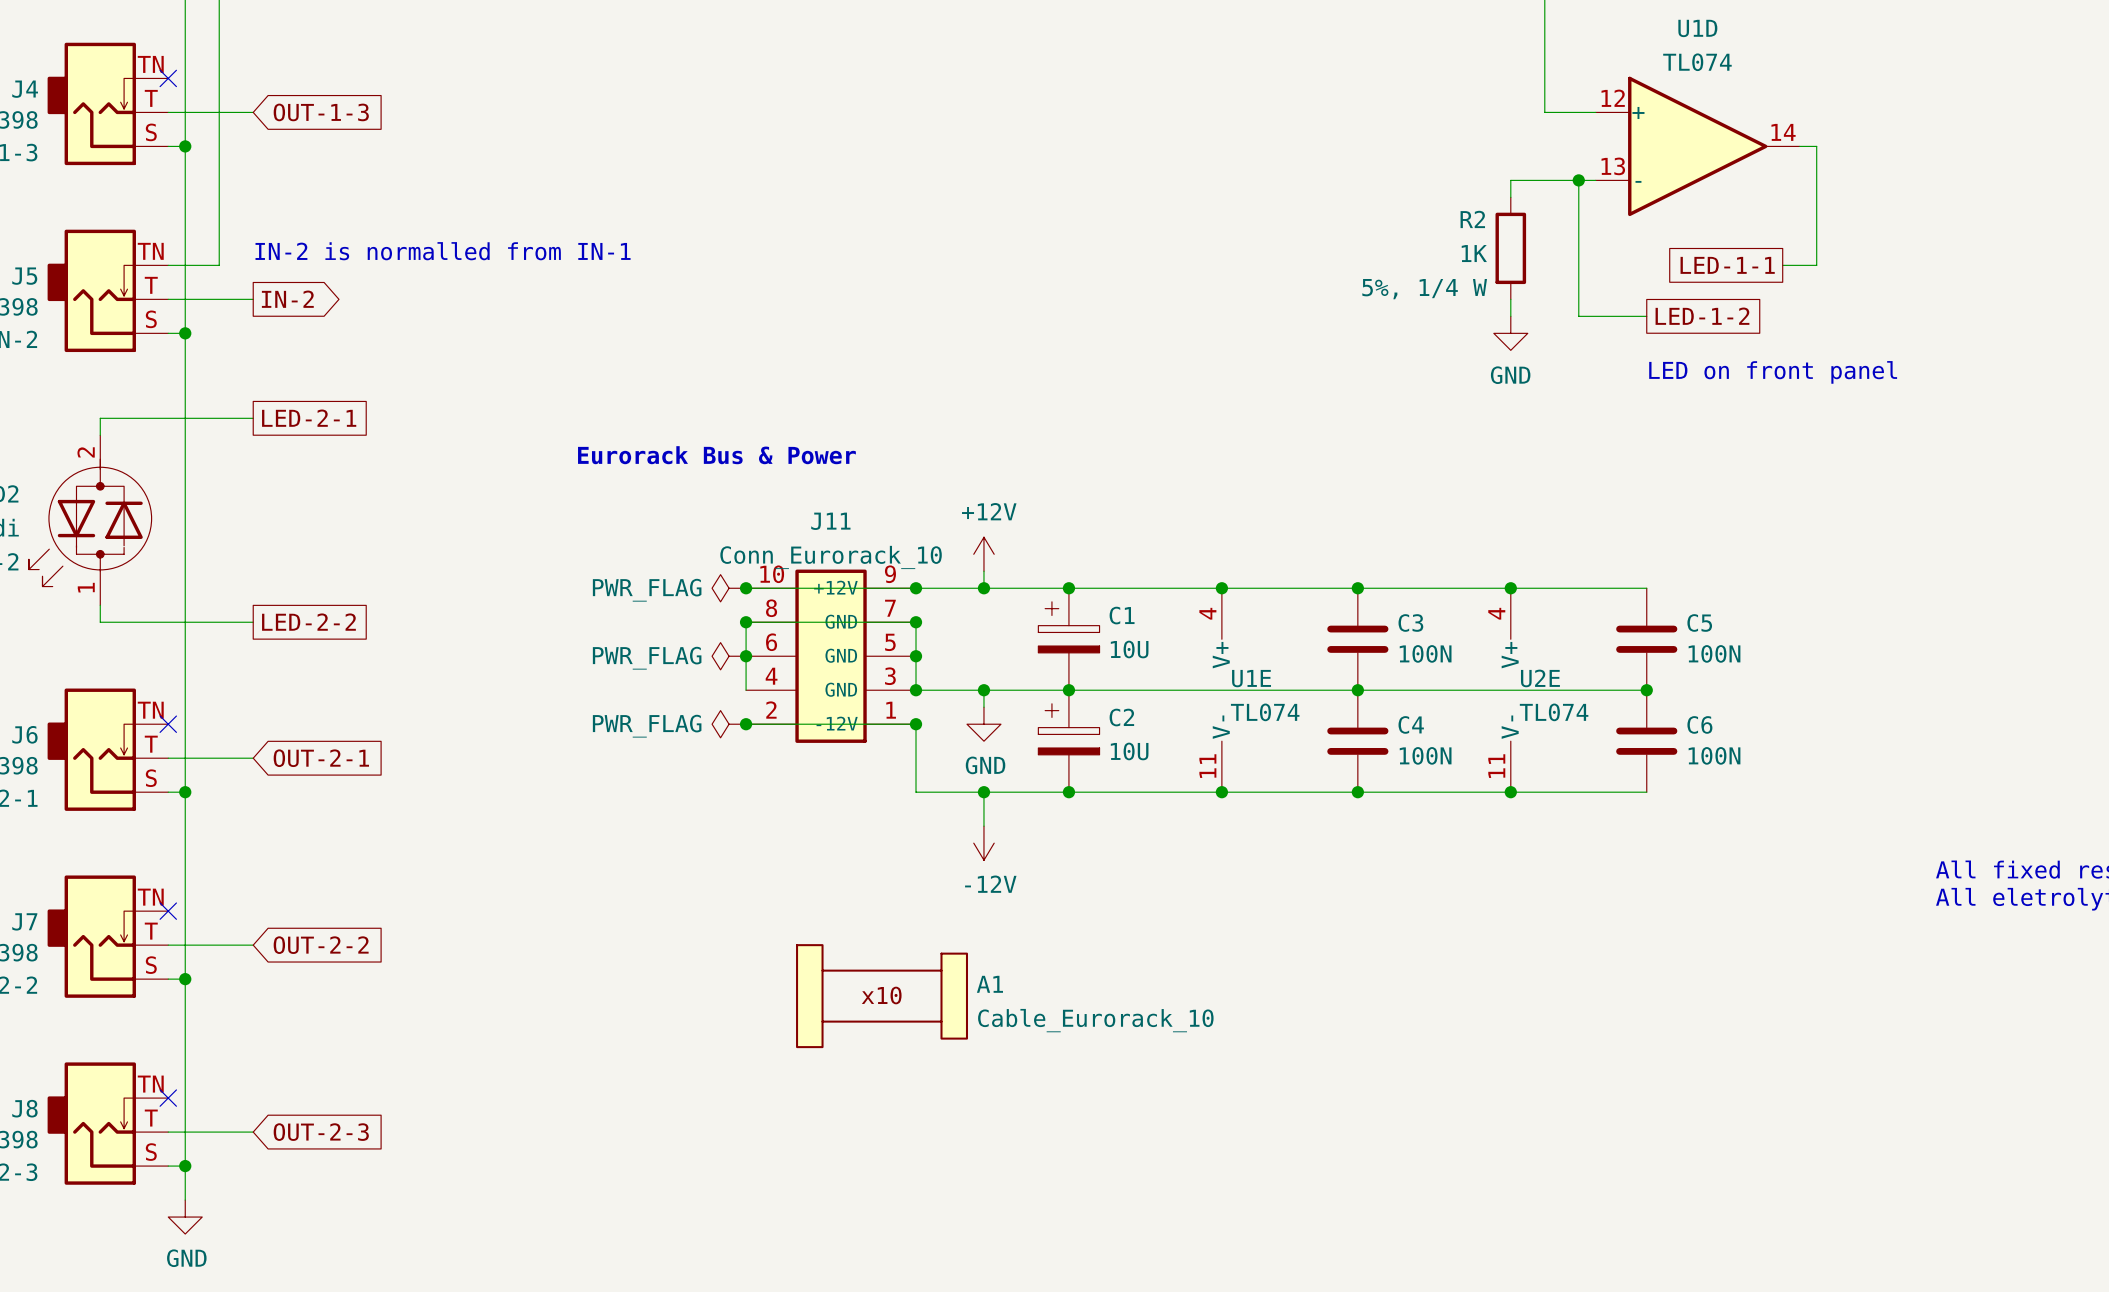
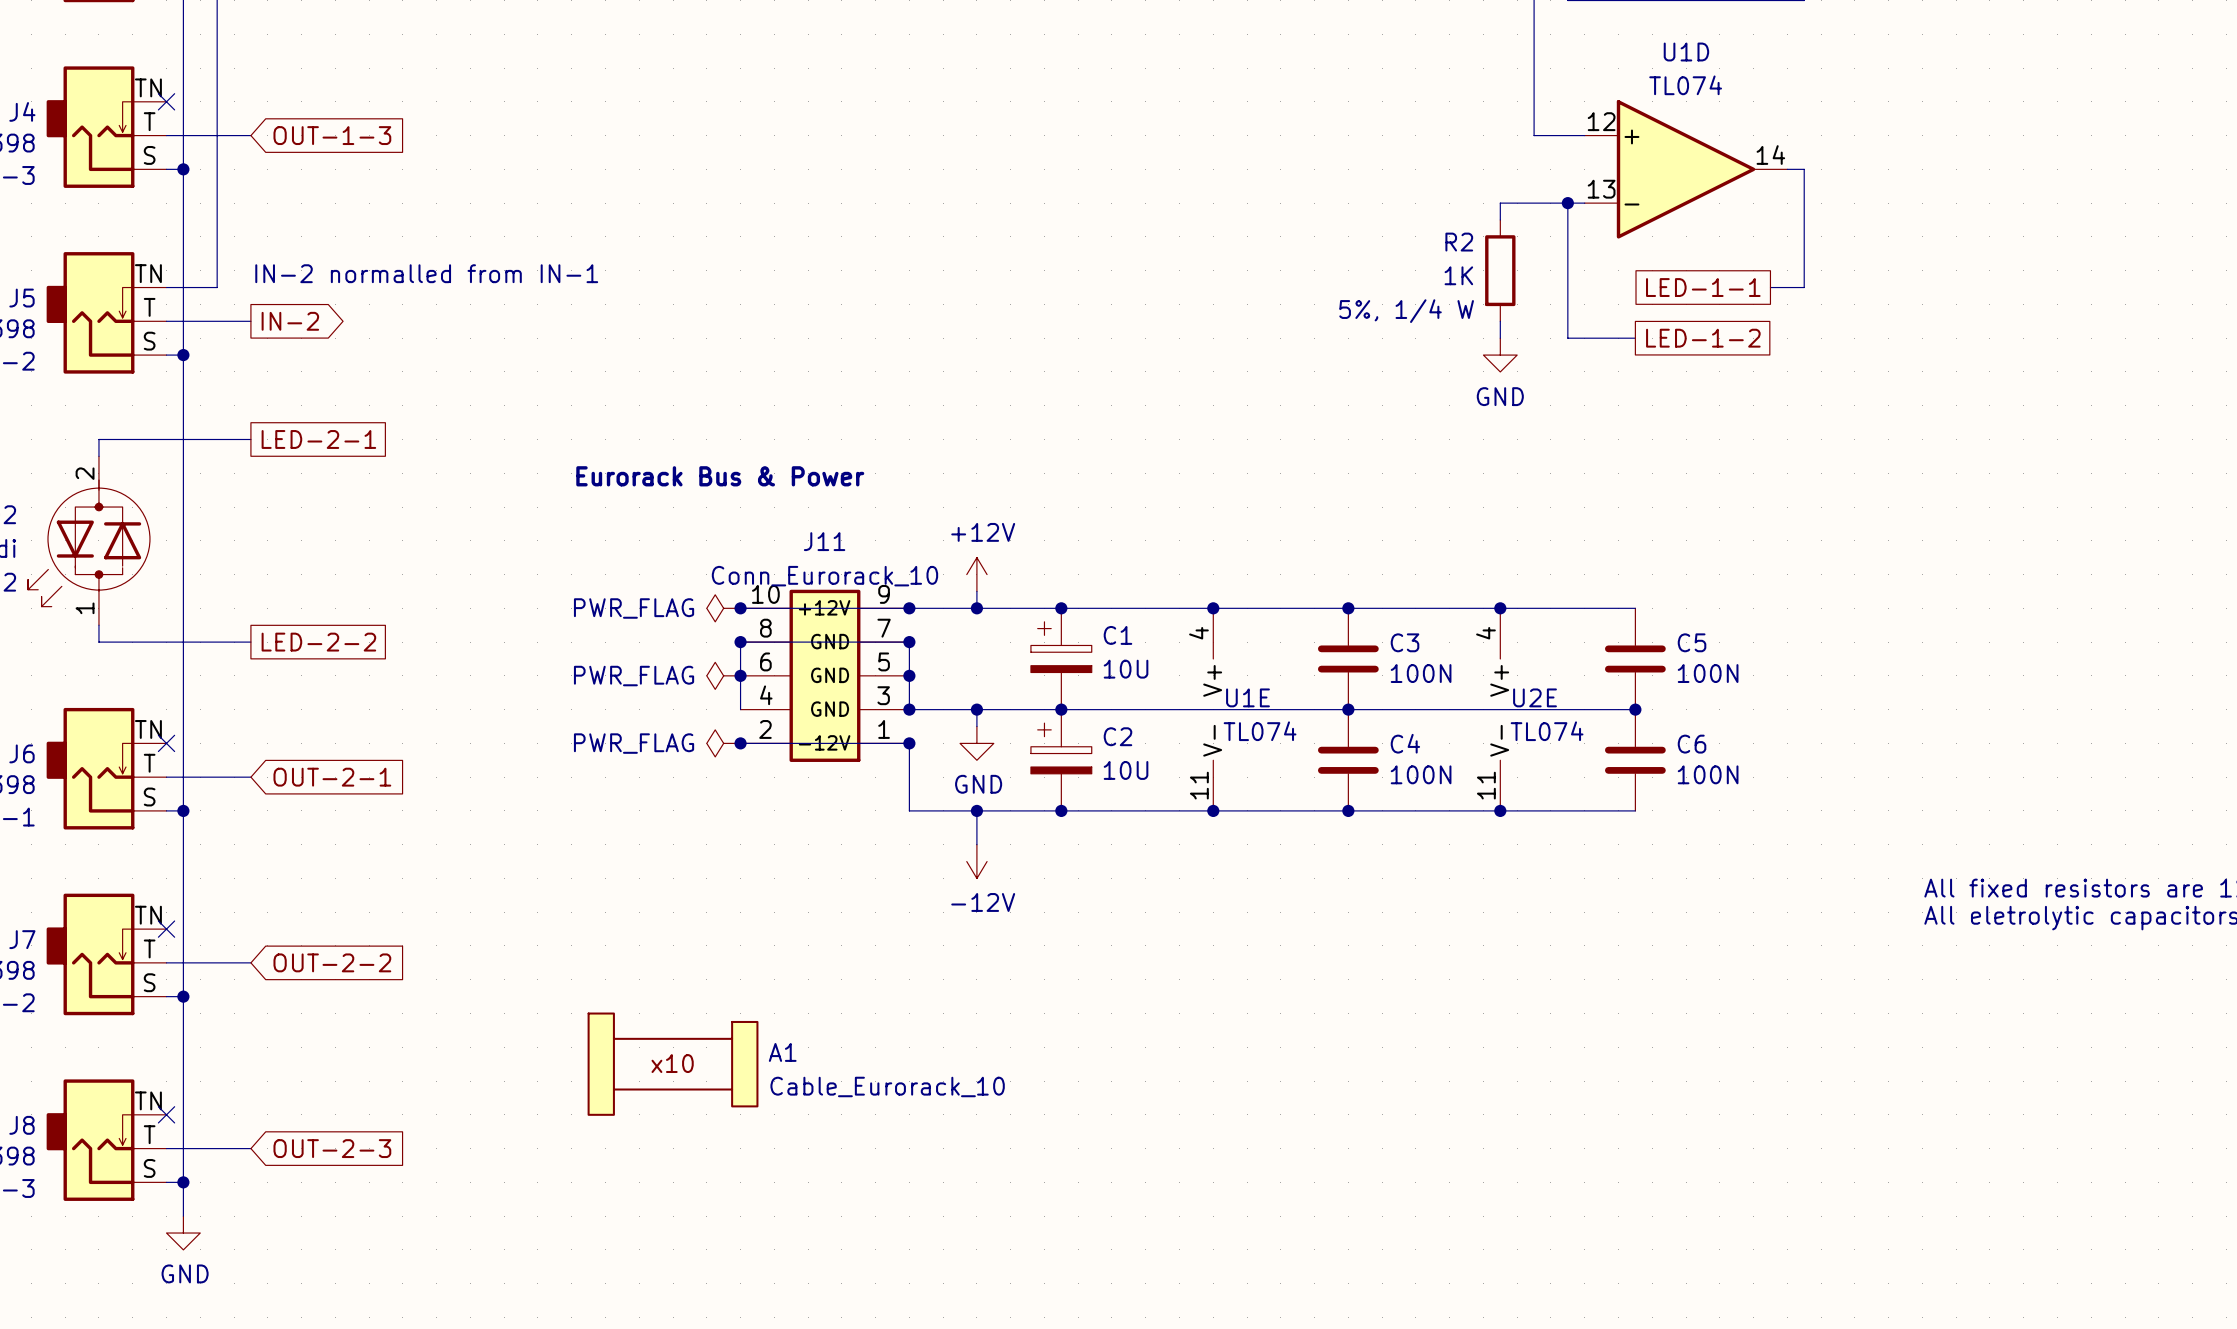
text: IN-2 is normalled from IN-1 (443, 251) -> IN-2 normalled from IN-1 (426, 273)
text: LED on front panel (1773, 372) -> none
A1 position: (882, 996) -> (673, 1064)

